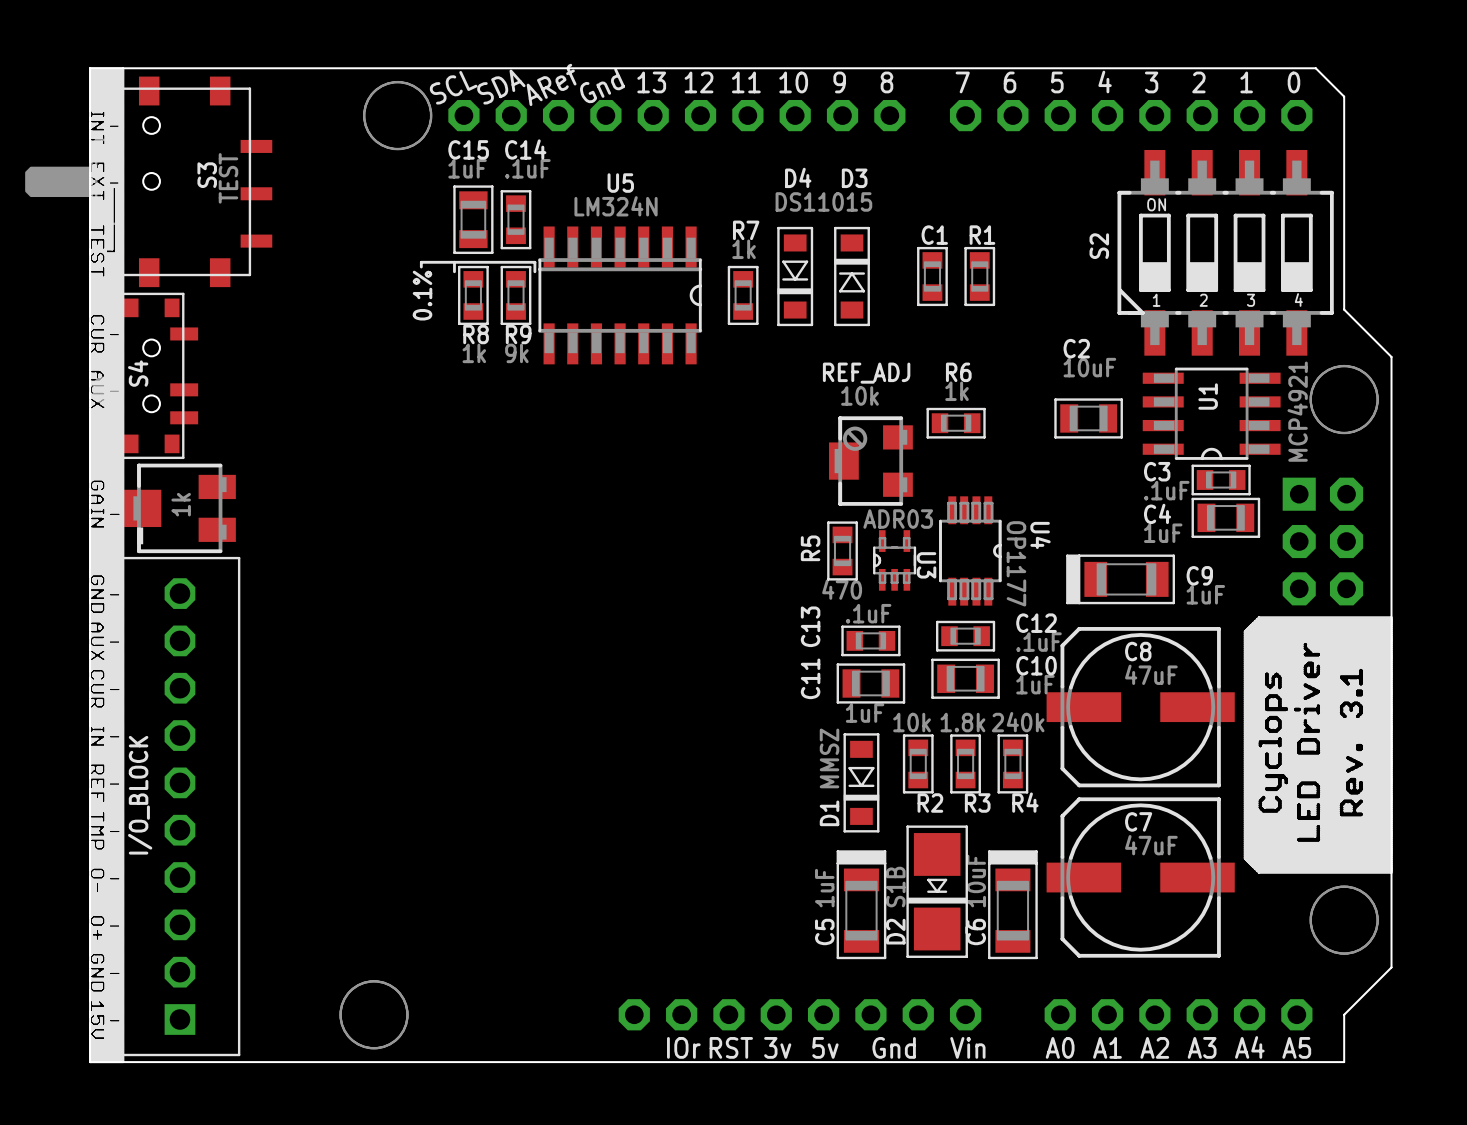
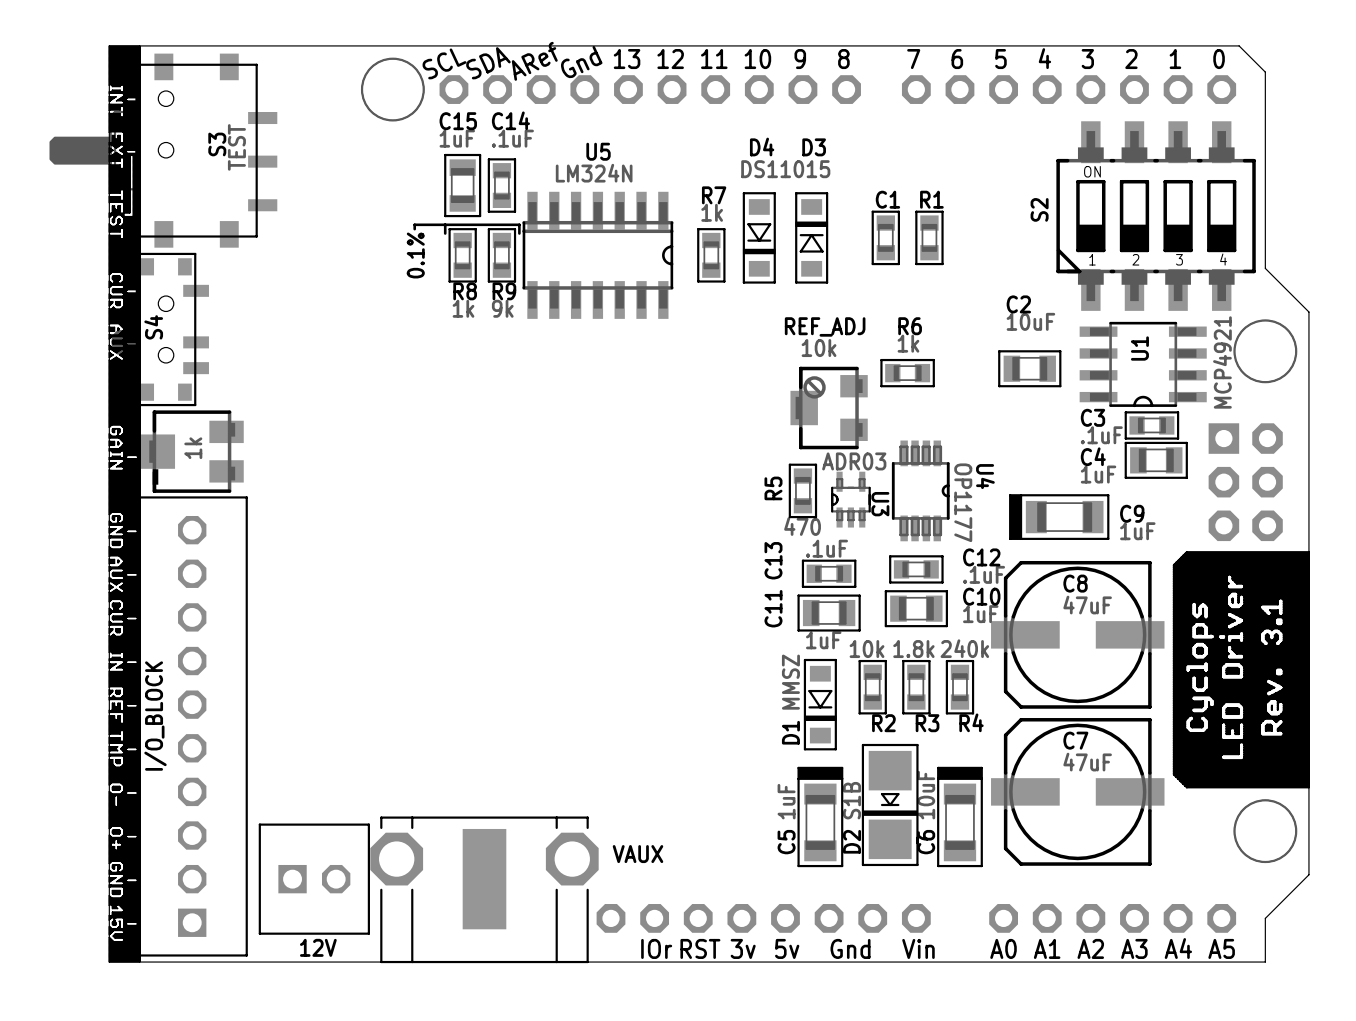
part footprint: [90, 68, 1392, 1063] -> [109, 45, 1309, 963]
12V: none -> (314, 879)
VAUX: none -> (484, 889)

